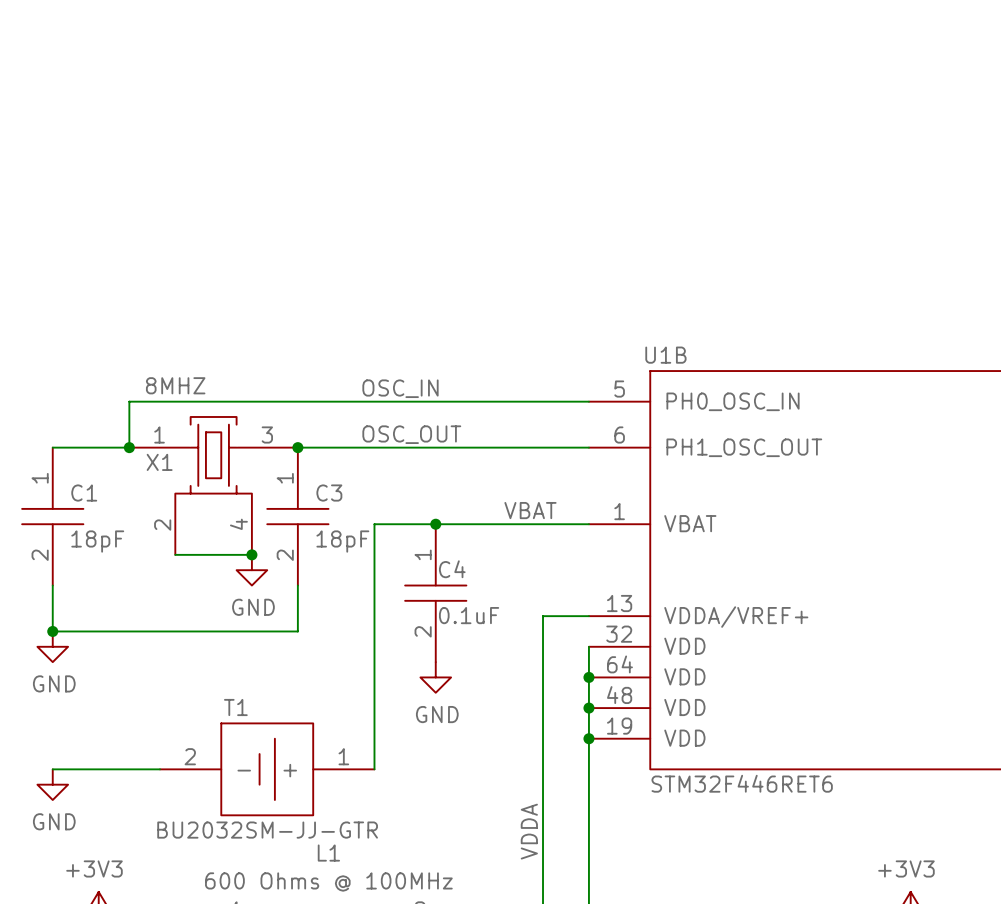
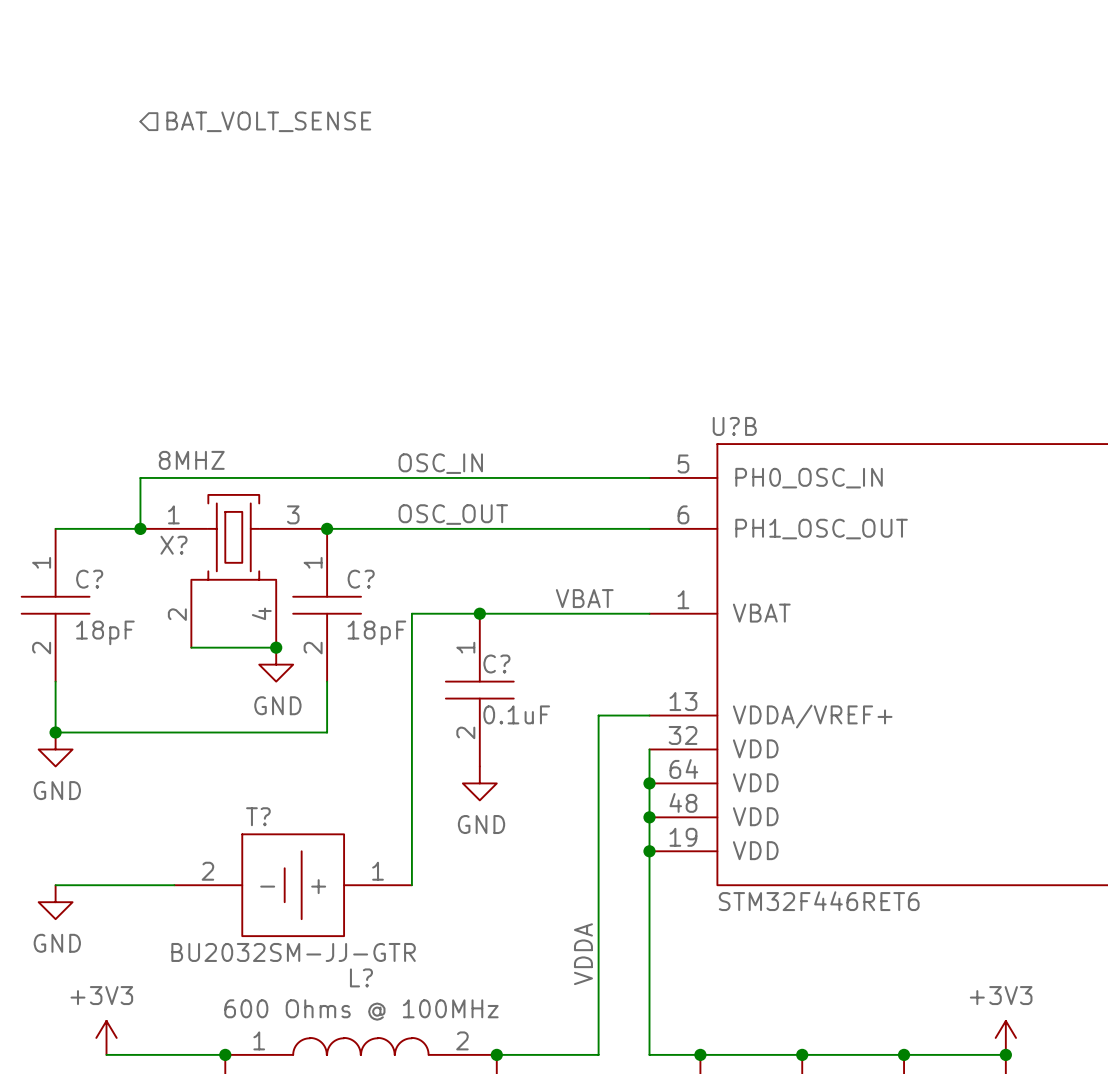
hierarchical label: none -> BAT_VOLT_SENSE (268, 121)
U1B name: U1B (665, 355) -> U?B (734, 426)
X1 name: X1 (159, 462) -> X? (173, 545)
C1 name: C1 (84, 493) -> C? (89, 579)
C3 name: C3 (329, 493) -> C? (361, 579)
C4 name: C4 (452, 569) -> C? (496, 664)
T1 name: T1 (235, 707) -> T? (258, 816)
L1 name: L1 (328, 853) -> L? (361, 977)

